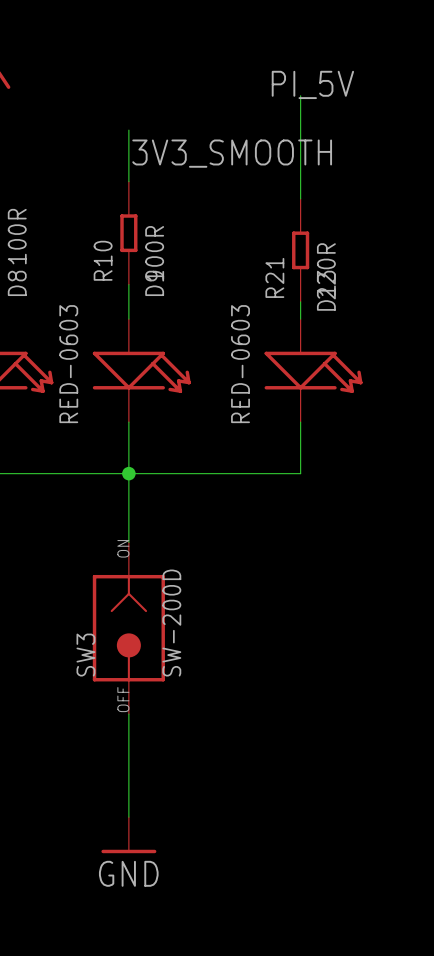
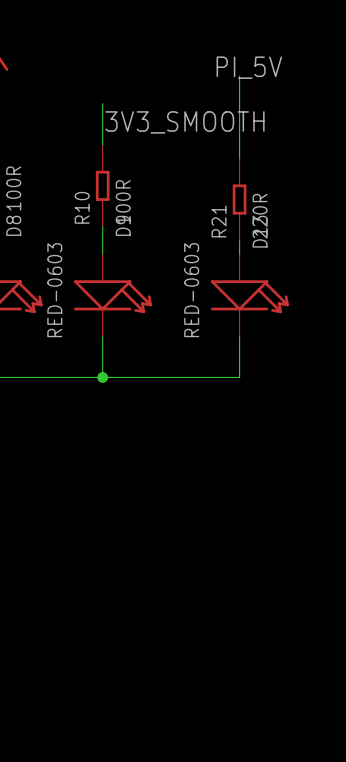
wire: (128, 473) (128, 542) -> none
SW3: SW-200D (128, 628) -> none
wire: (128, 714) (128, 817) -> none
power symbol: GND (128, 835) -> none

